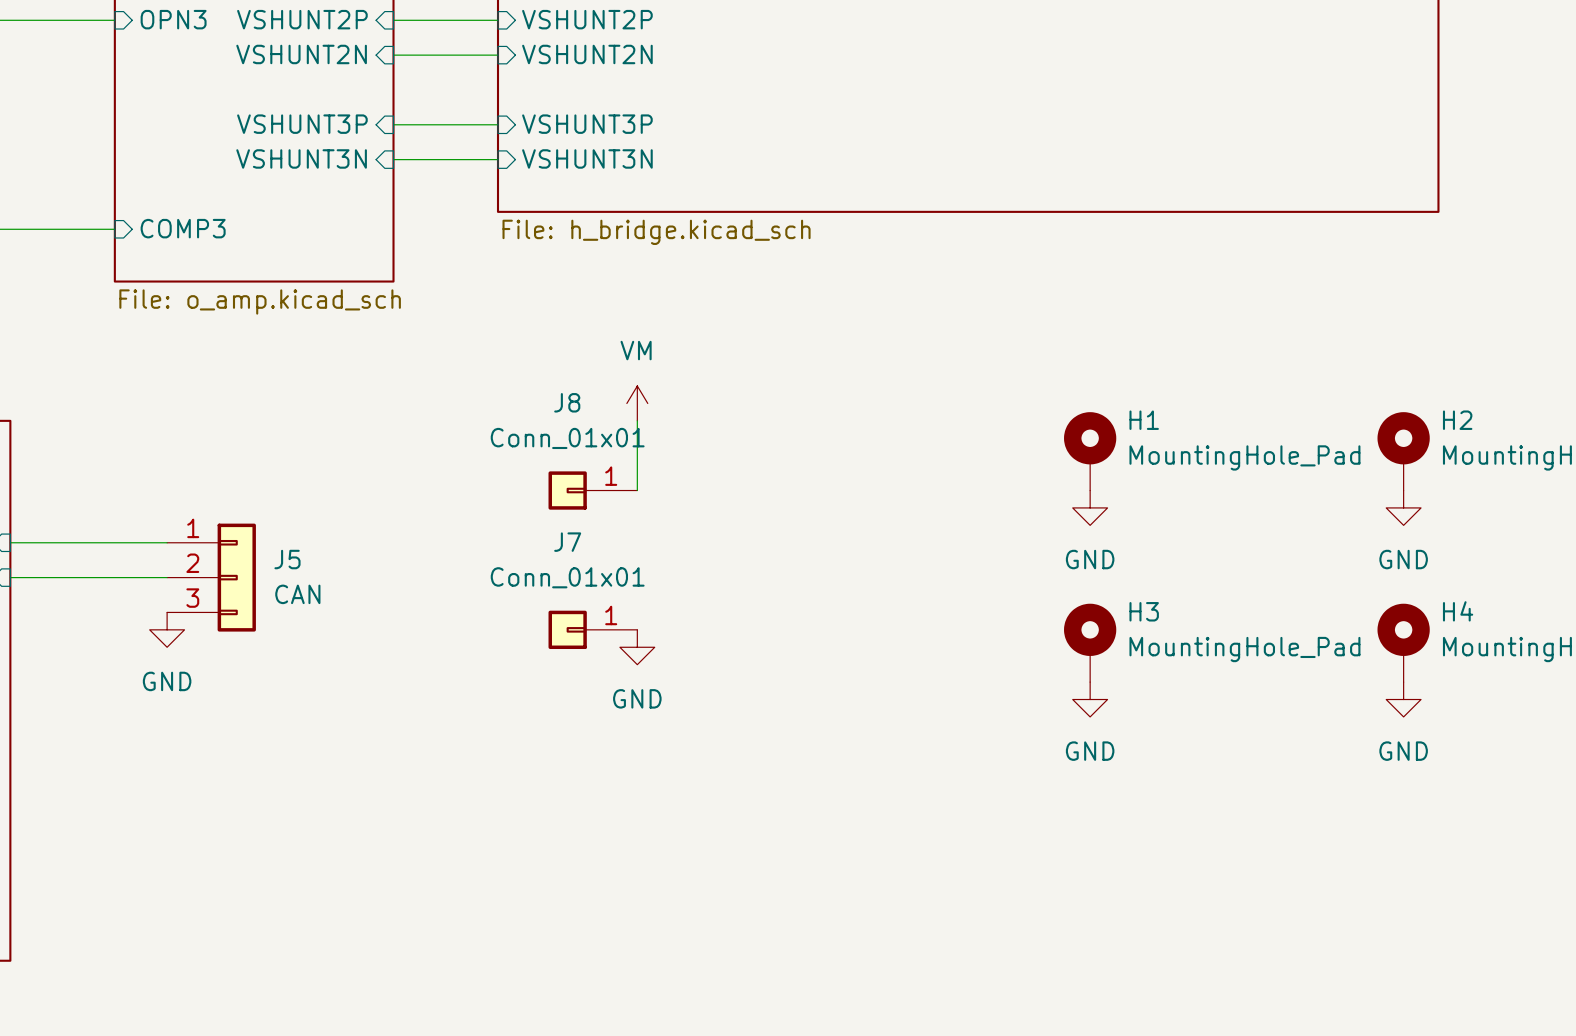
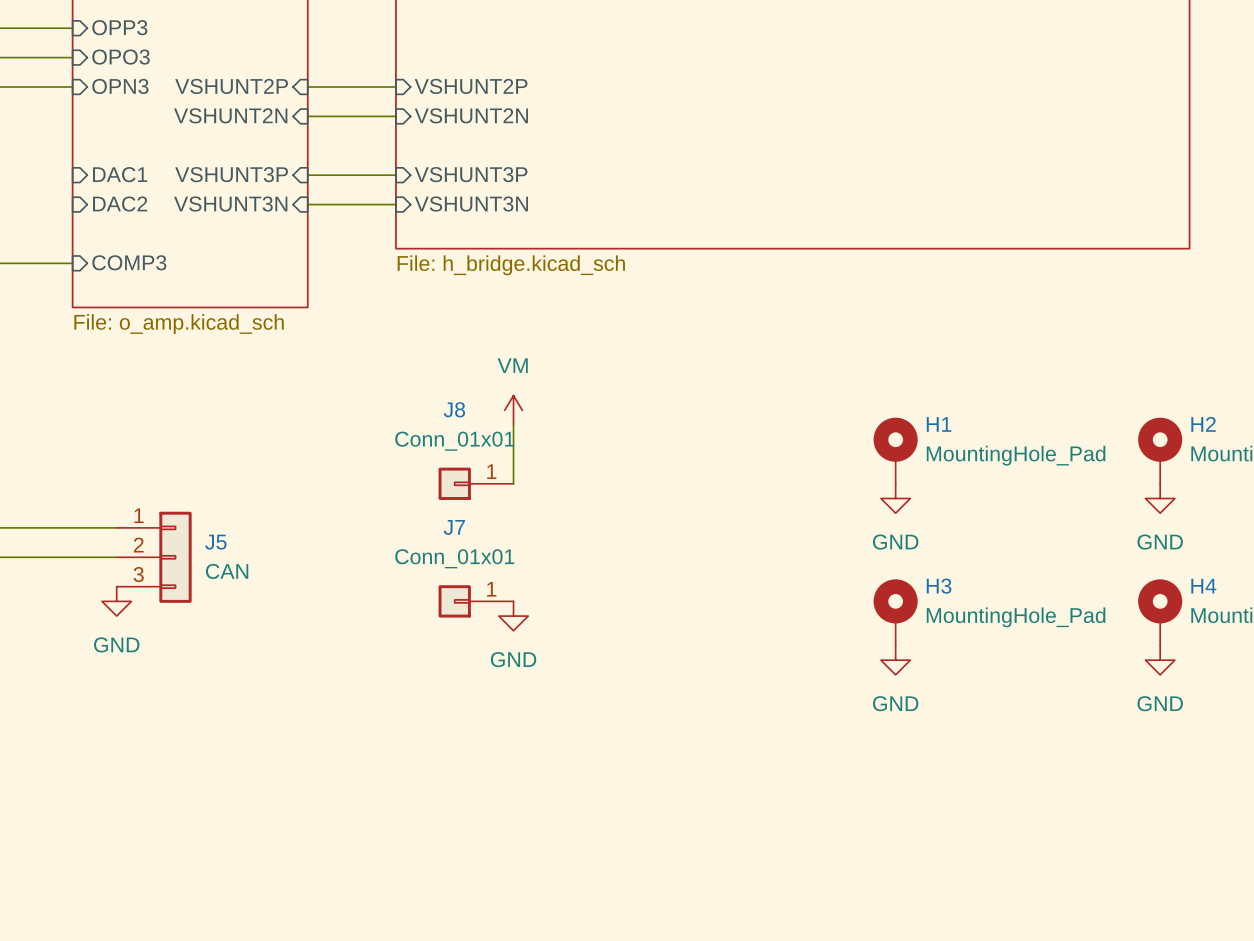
sheet pin: none -> DAC1 (120, 174)
sheet pin: none -> DAC2 (120, 204)

